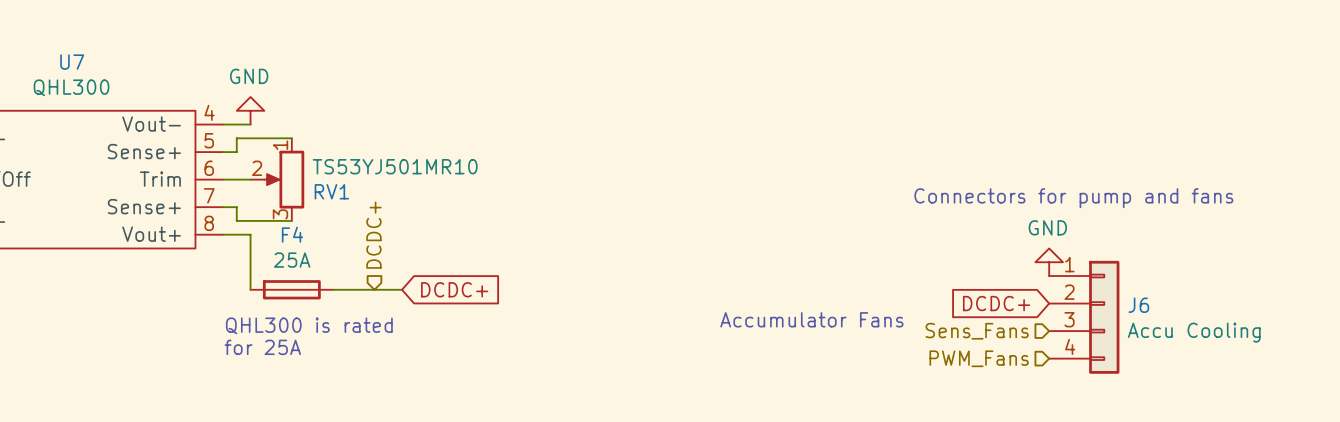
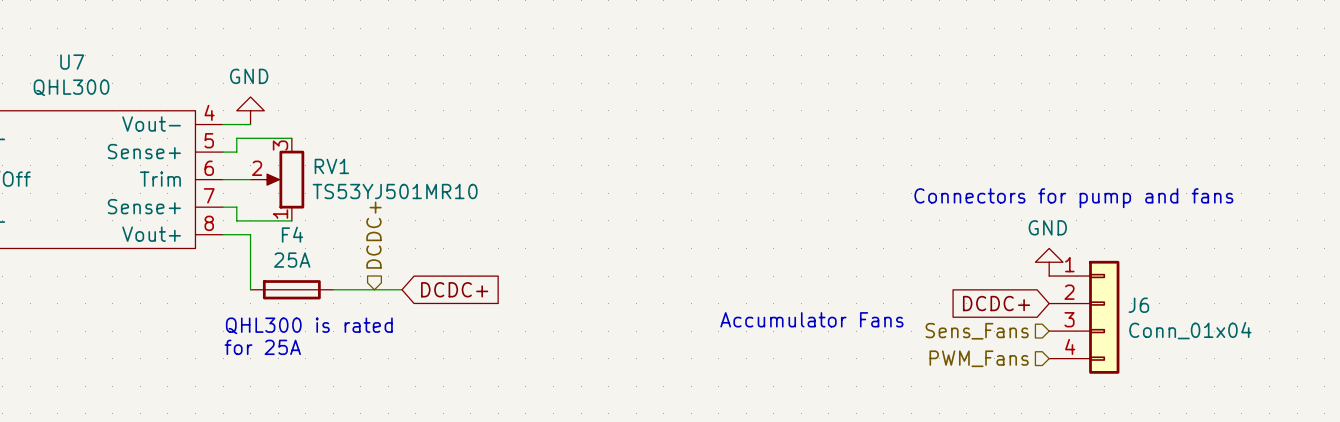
RV1 flip: as is (284, 179) -> up-down (284, 179)
J6 value: Accu Cooling (1194, 332) -> Conn_01x04 (1190, 330)

